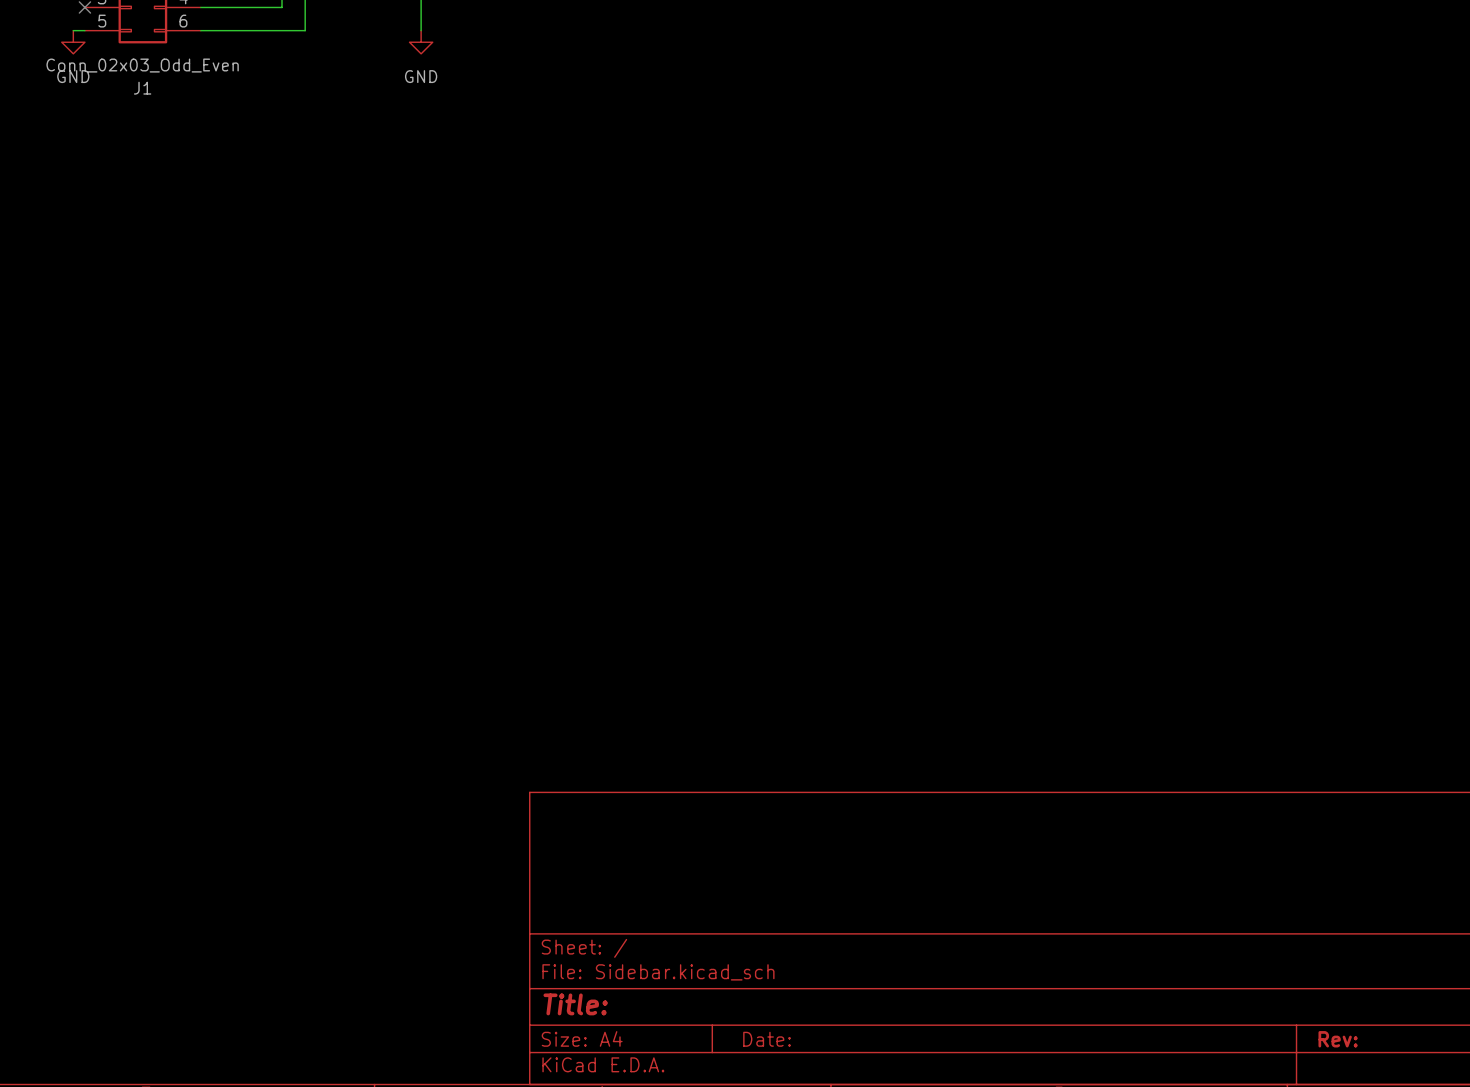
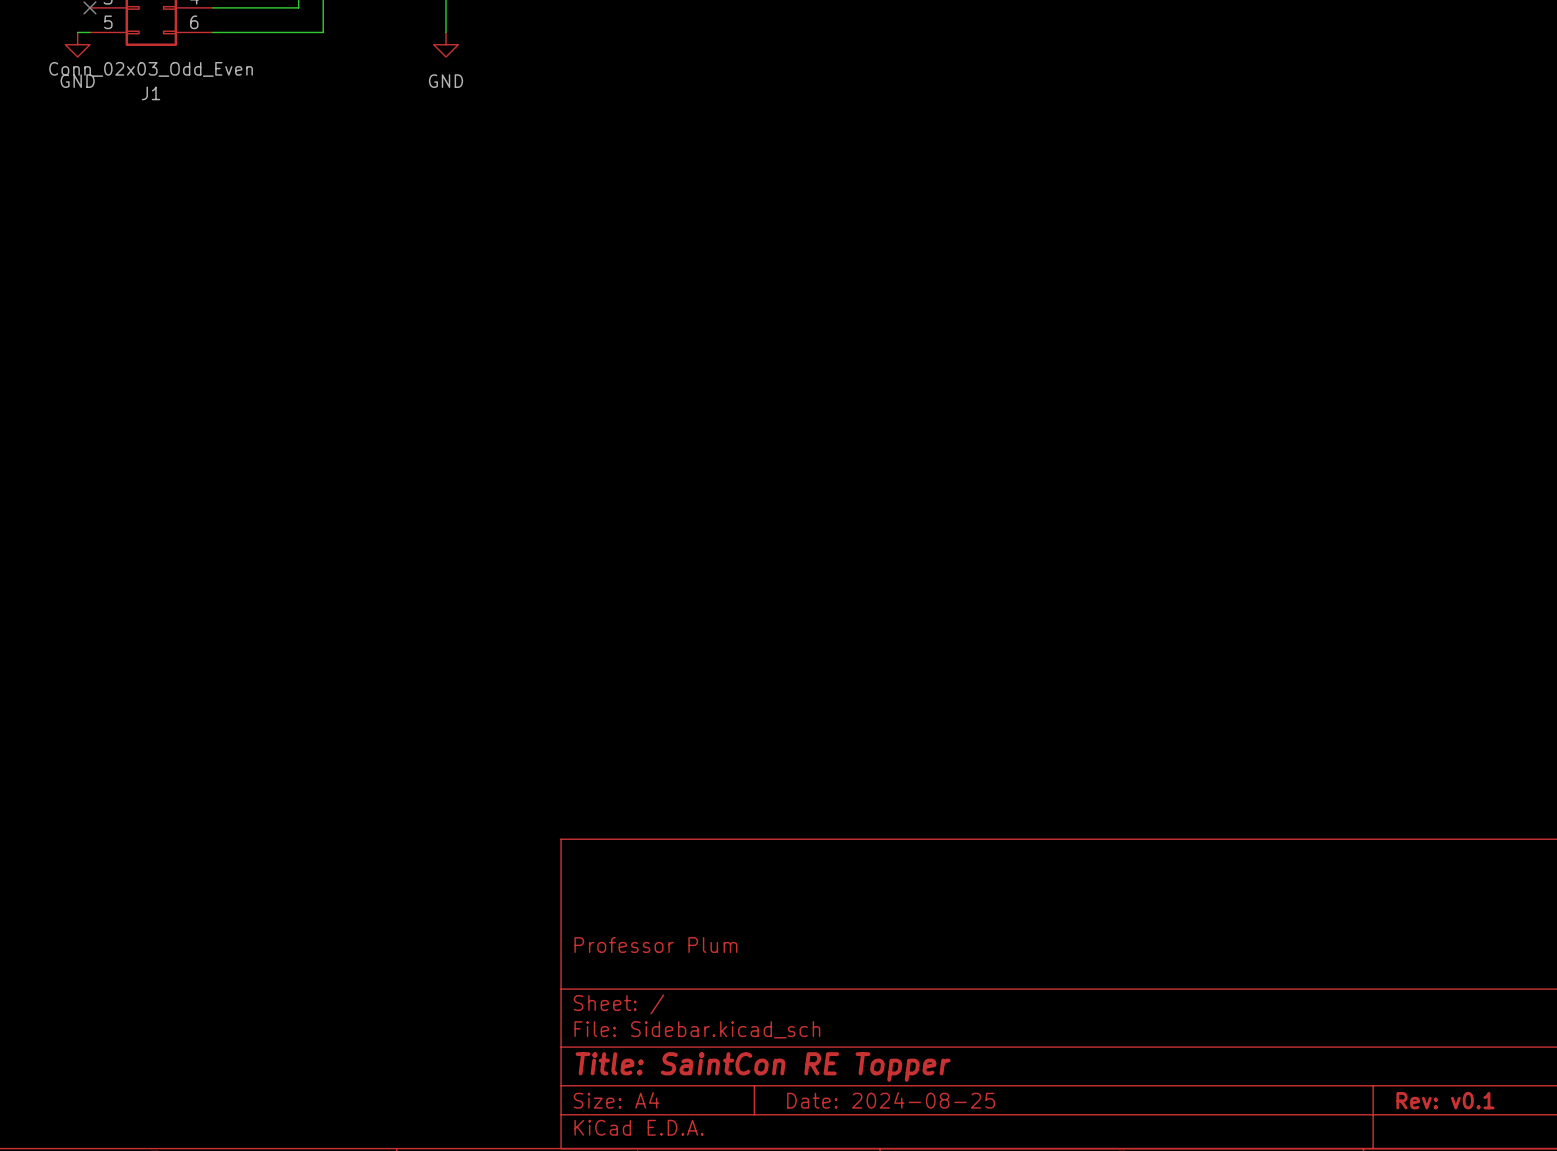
title block: none -> Professor Plum (655, 945)
title block: Title: (575, 1004) -> Title: SaintCon RE Topper (763, 1066)
title block: Date: (767, 1039) -> Date: 2024-08-25 (891, 1100)
title block: Rev: (1338, 1039) -> Rev: v0.1 (1445, 1100)

